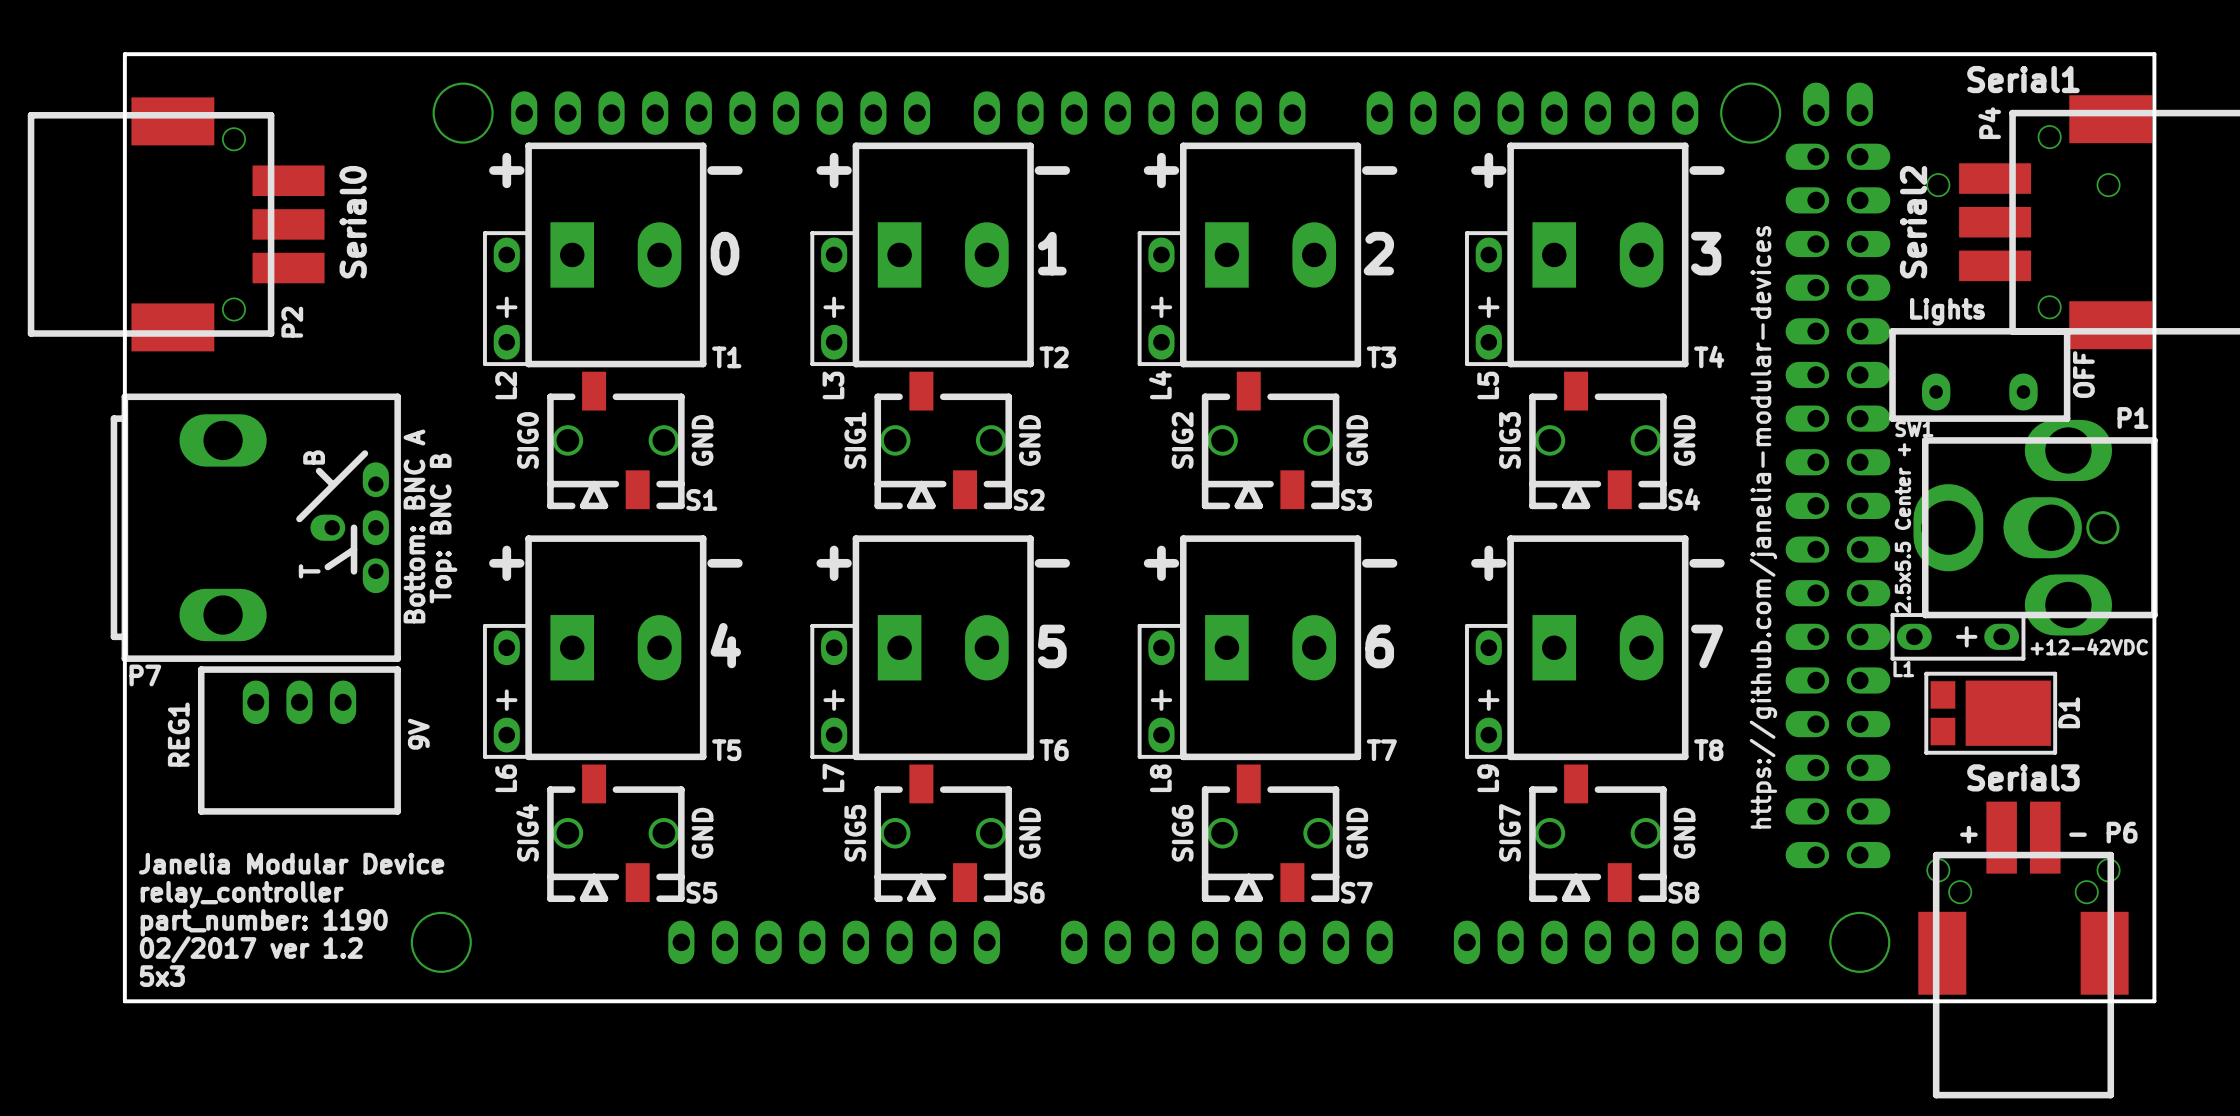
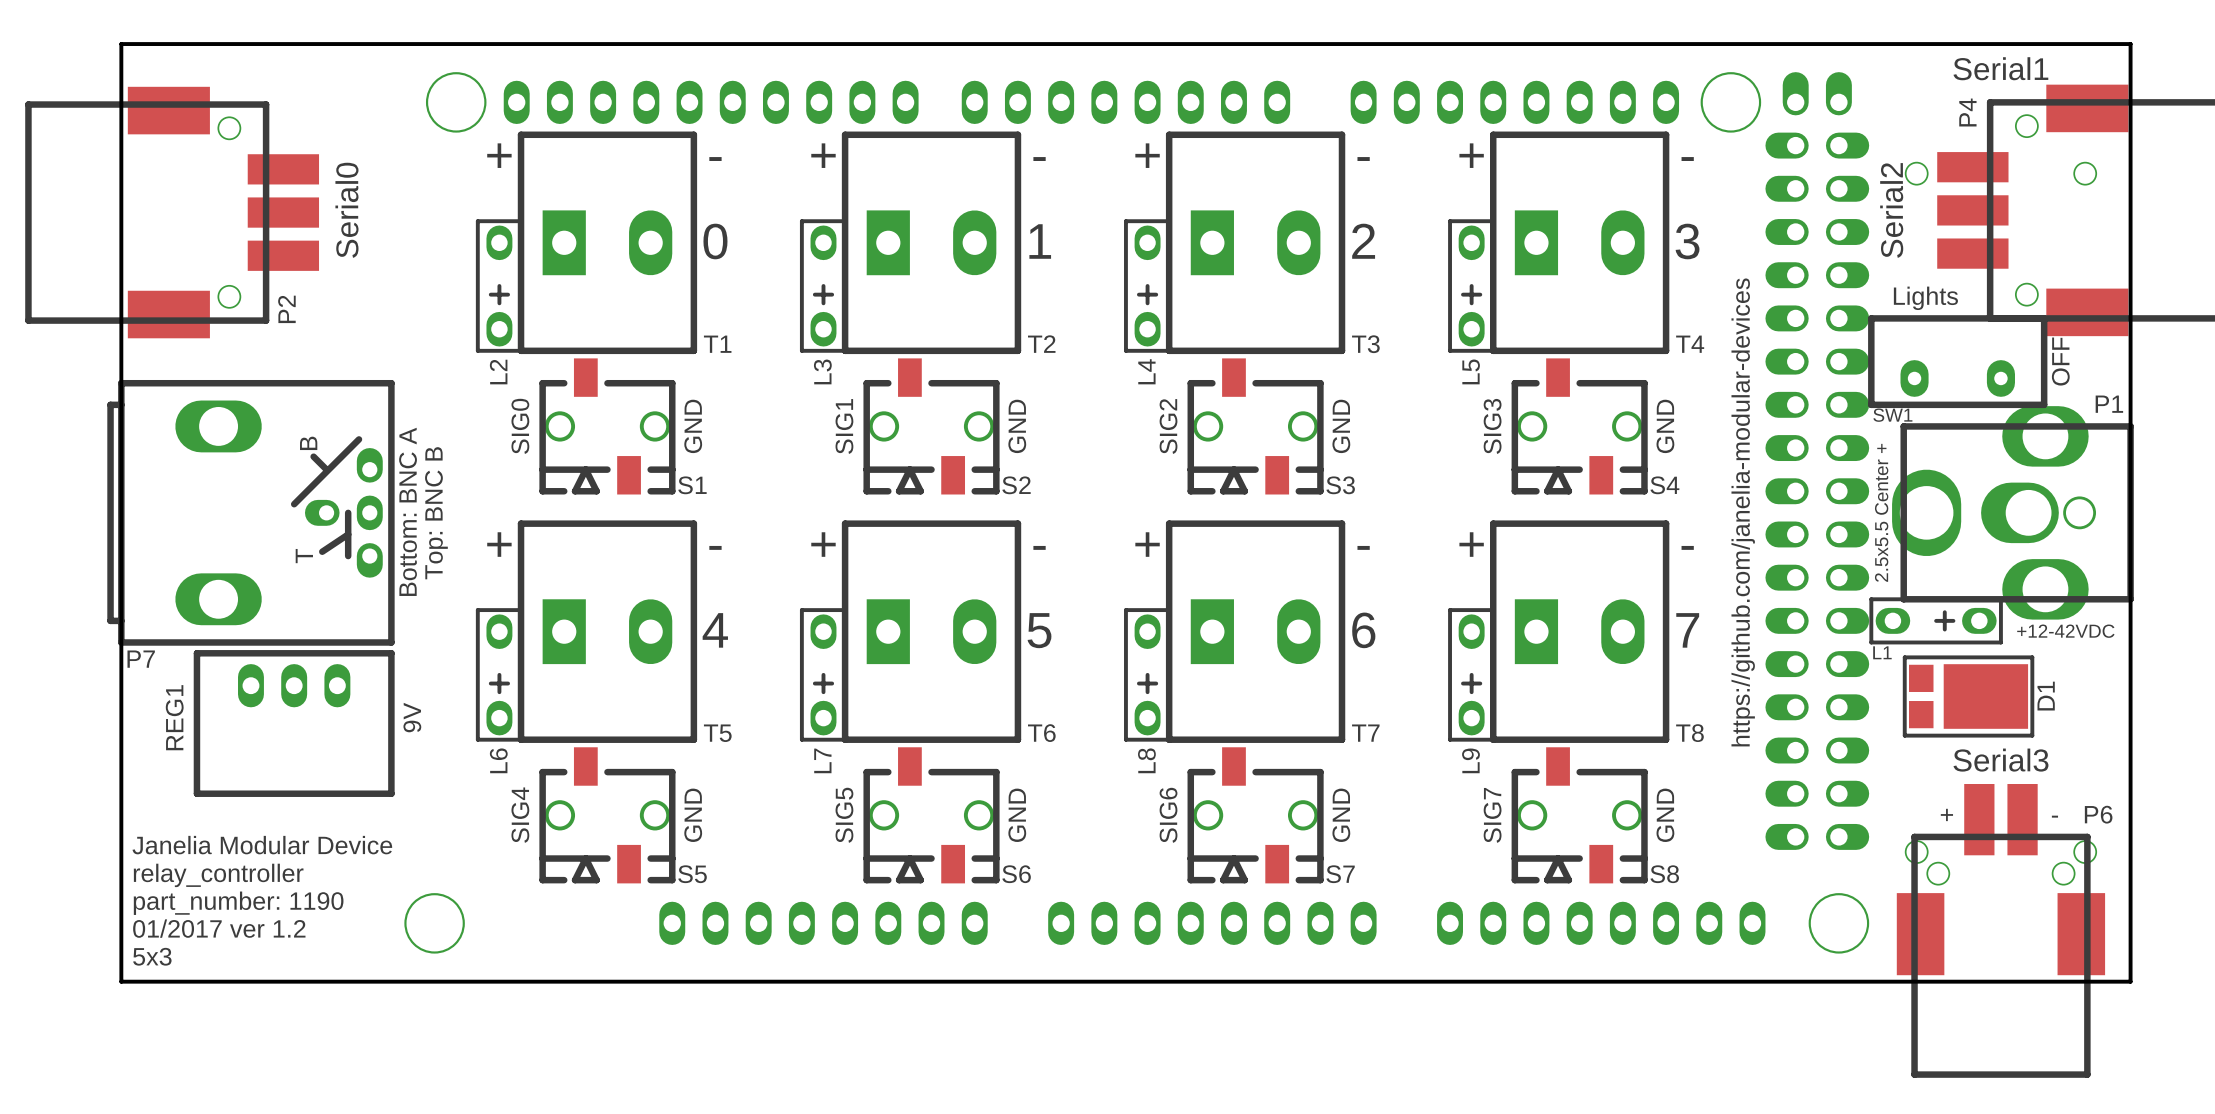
text: 02/2017 ver 1.2 (251, 949) -> 01/2017 ver 1.2 (219, 928)

